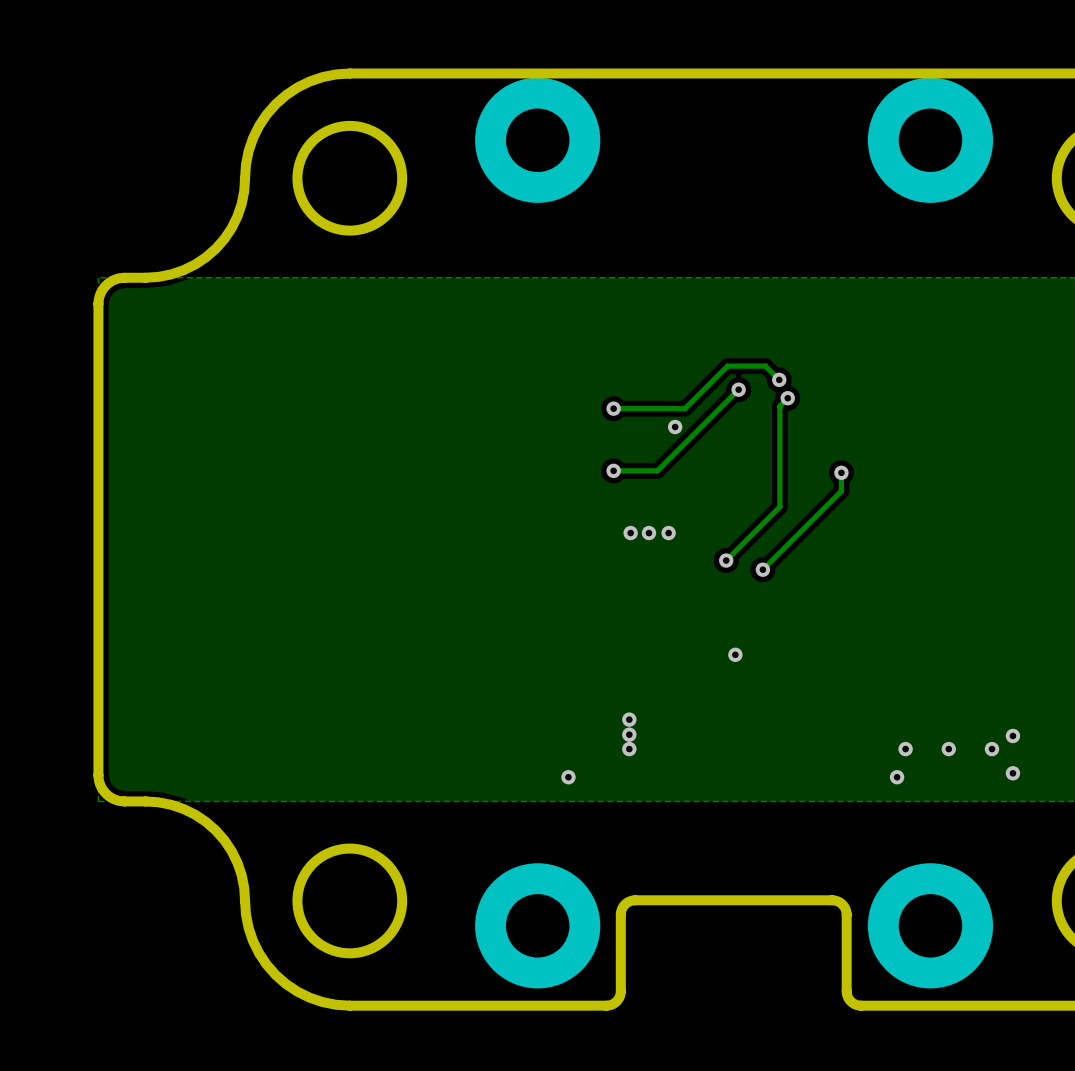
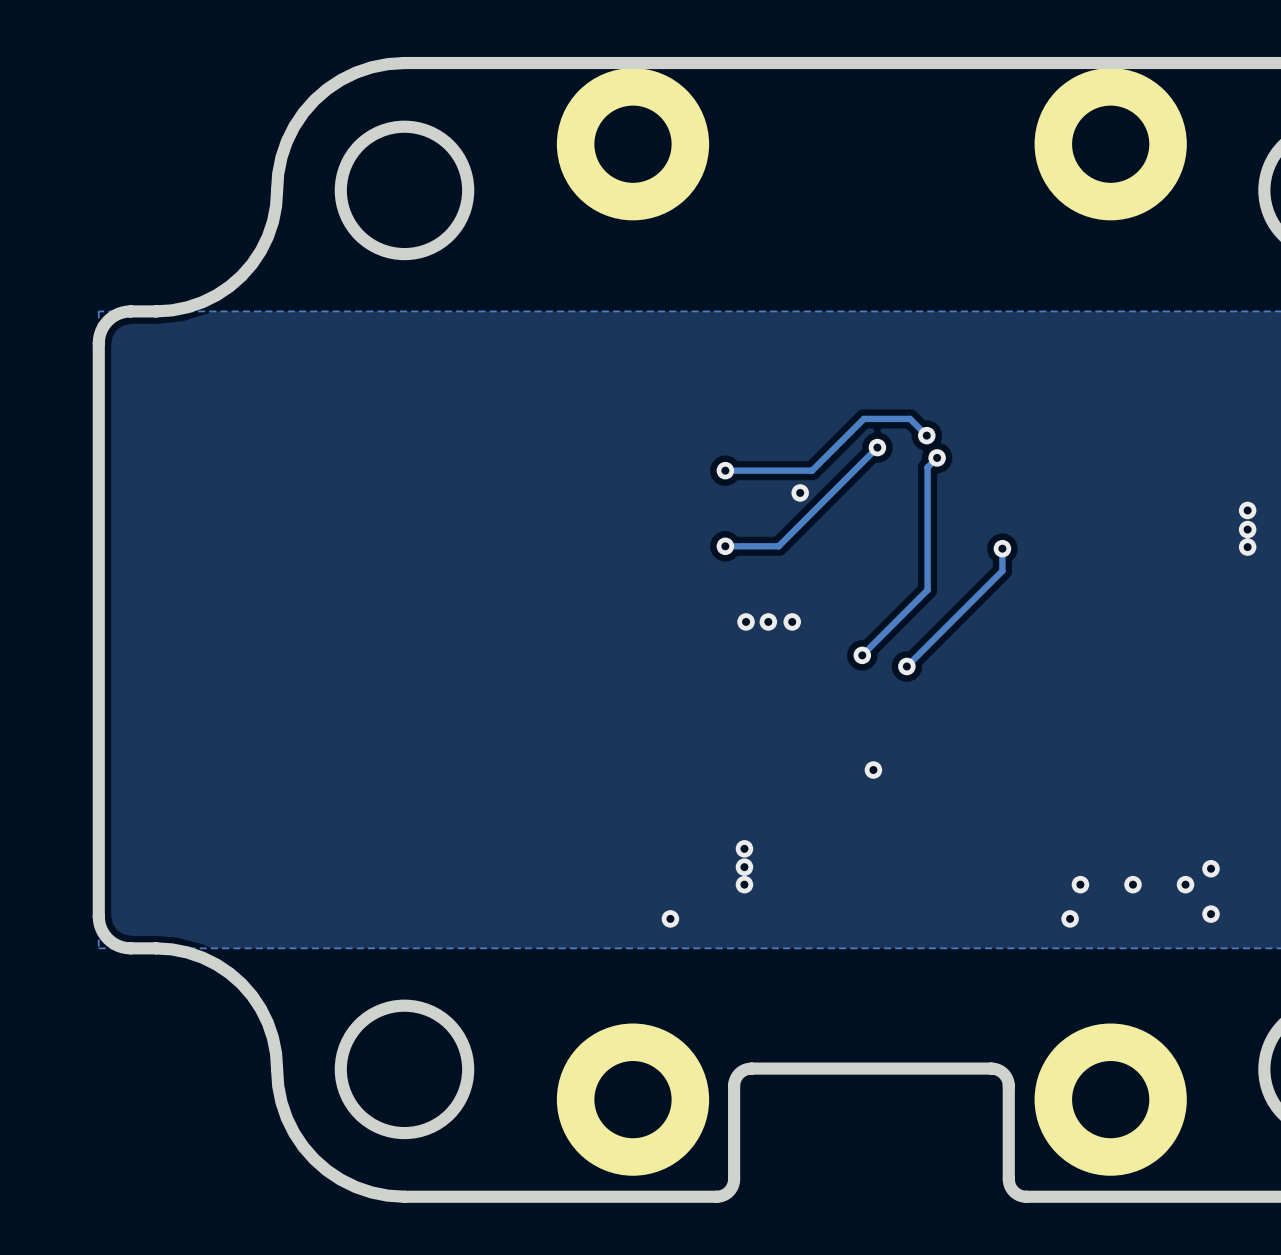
via: none -> (1247, 510)
via: none -> (1247, 529)
via: none -> (1247, 547)

